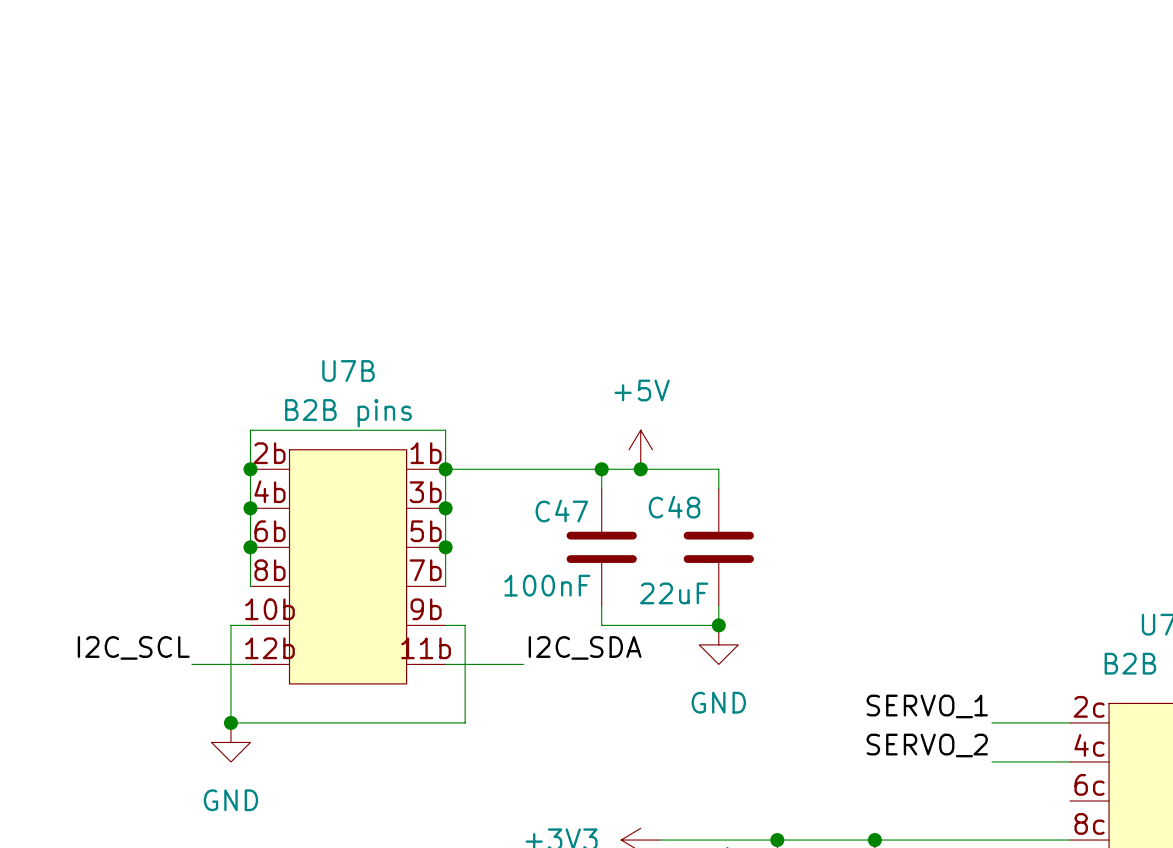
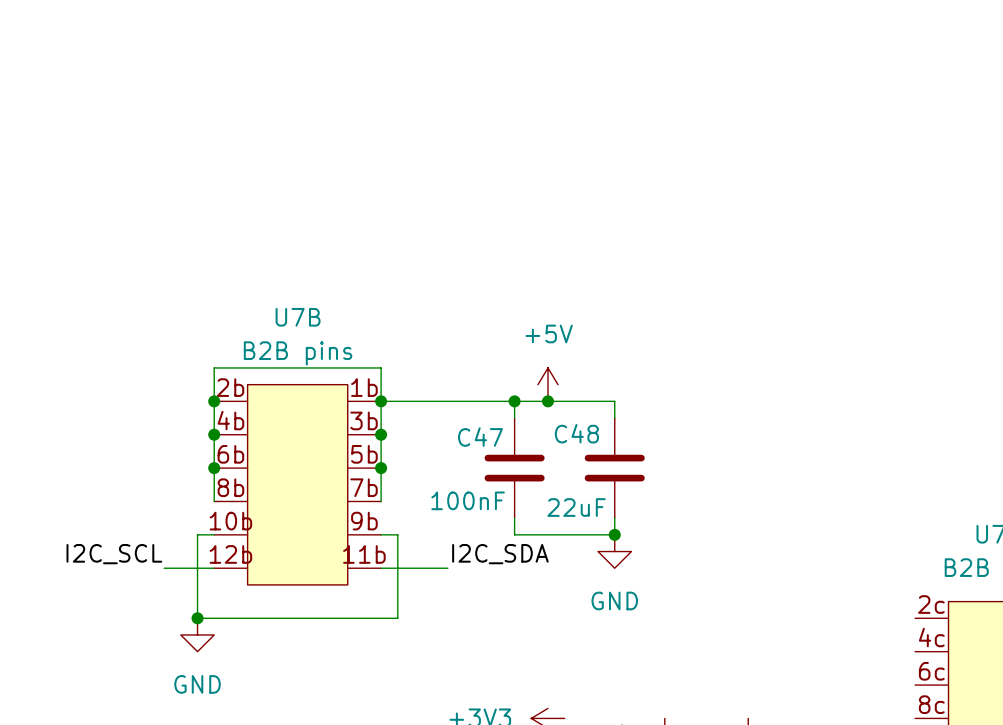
label: SERVO_1 (927, 706) -> none
wire: (991, 722) (1070, 722) -> none
label: SERVO_2 (927, 745) -> none
wire: (991, 761) (1070, 761) -> none
wire: (660, 840) (1070, 840) -> none
junction: (777, 840) -> none
junction: (874, 840) -> none

